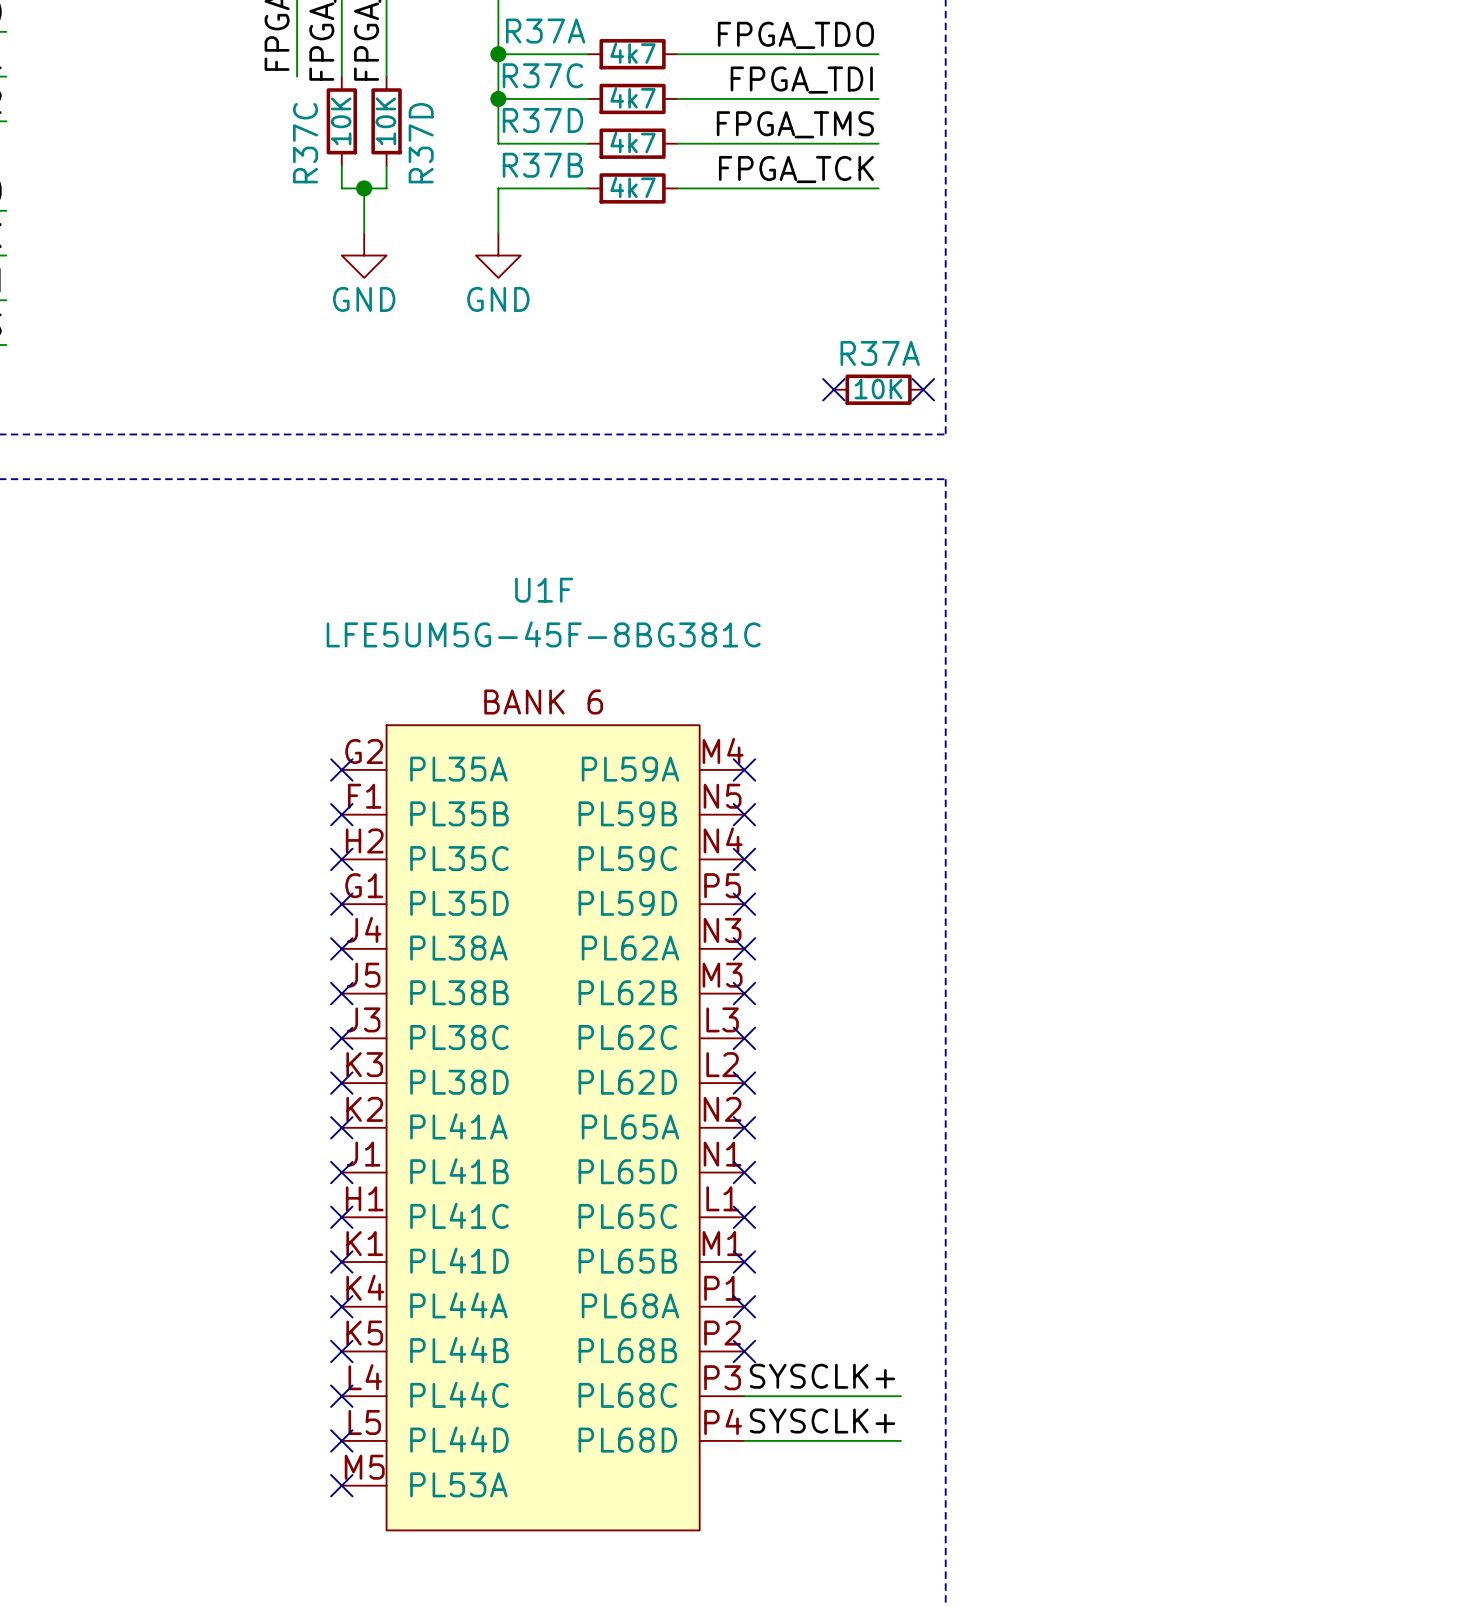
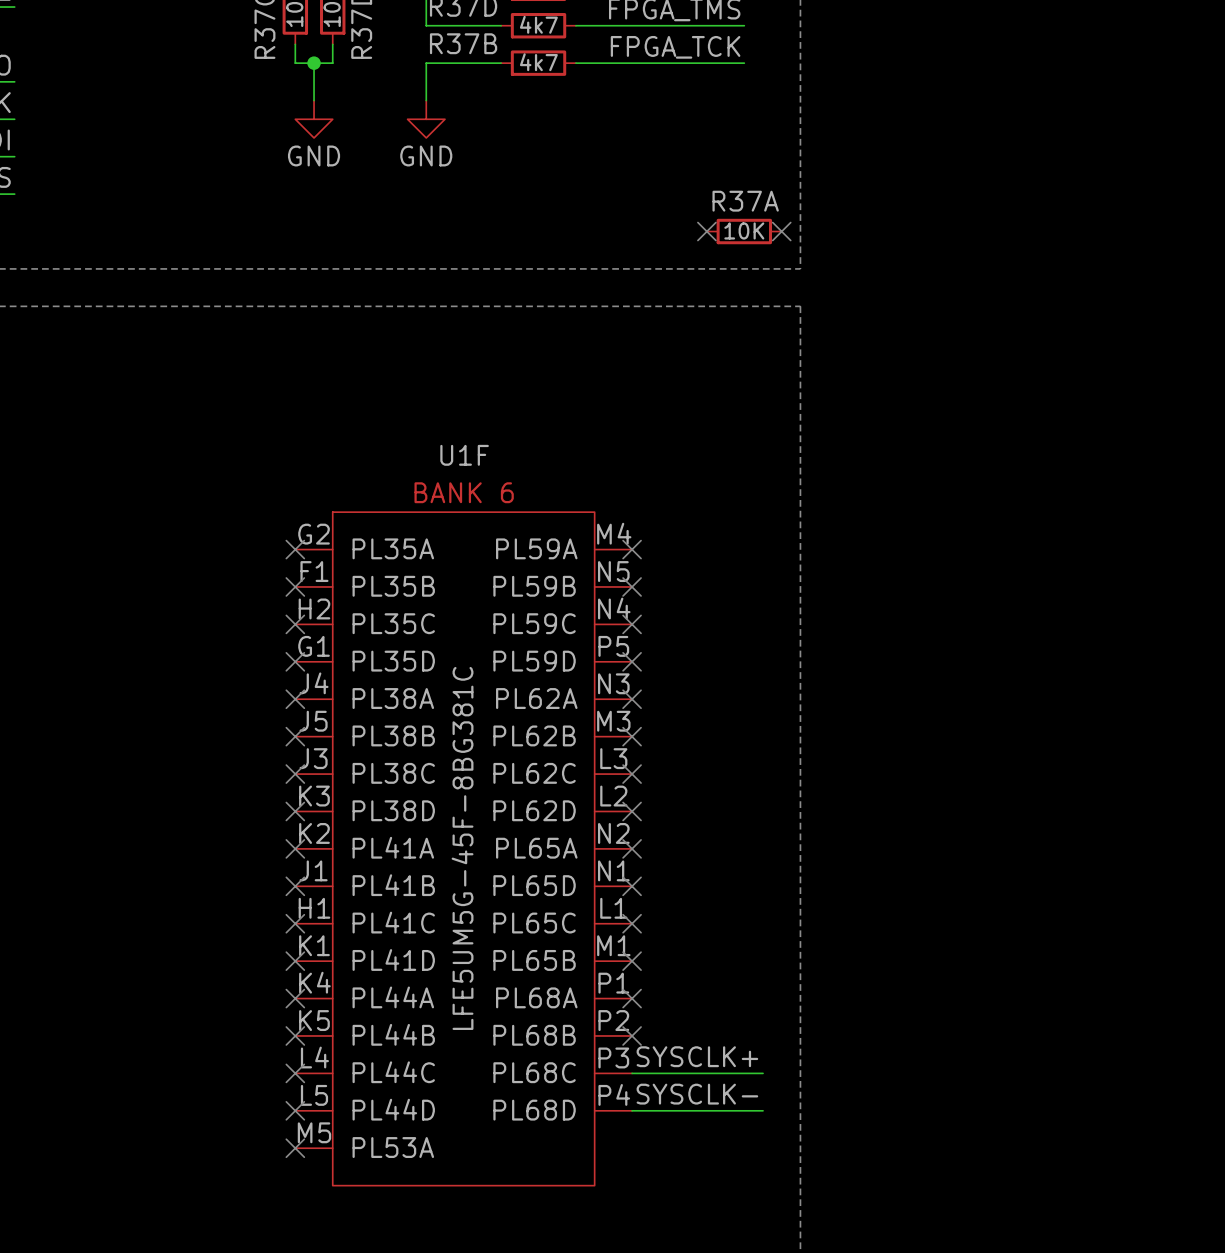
U1F name position: U1F (544, 590) -> U1F (464, 455)
U1F value rotation: 0° (543, 634) -> 90° counterclockwise (462, 848)
U1F value position: LFE5UM5G-45F-8BG381C (543, 634) -> LFE5UM5G-45F-8BG381C (462, 848)
label: SYSCLK+ (822, 1420) -> SYSCLK- (697, 1094)

